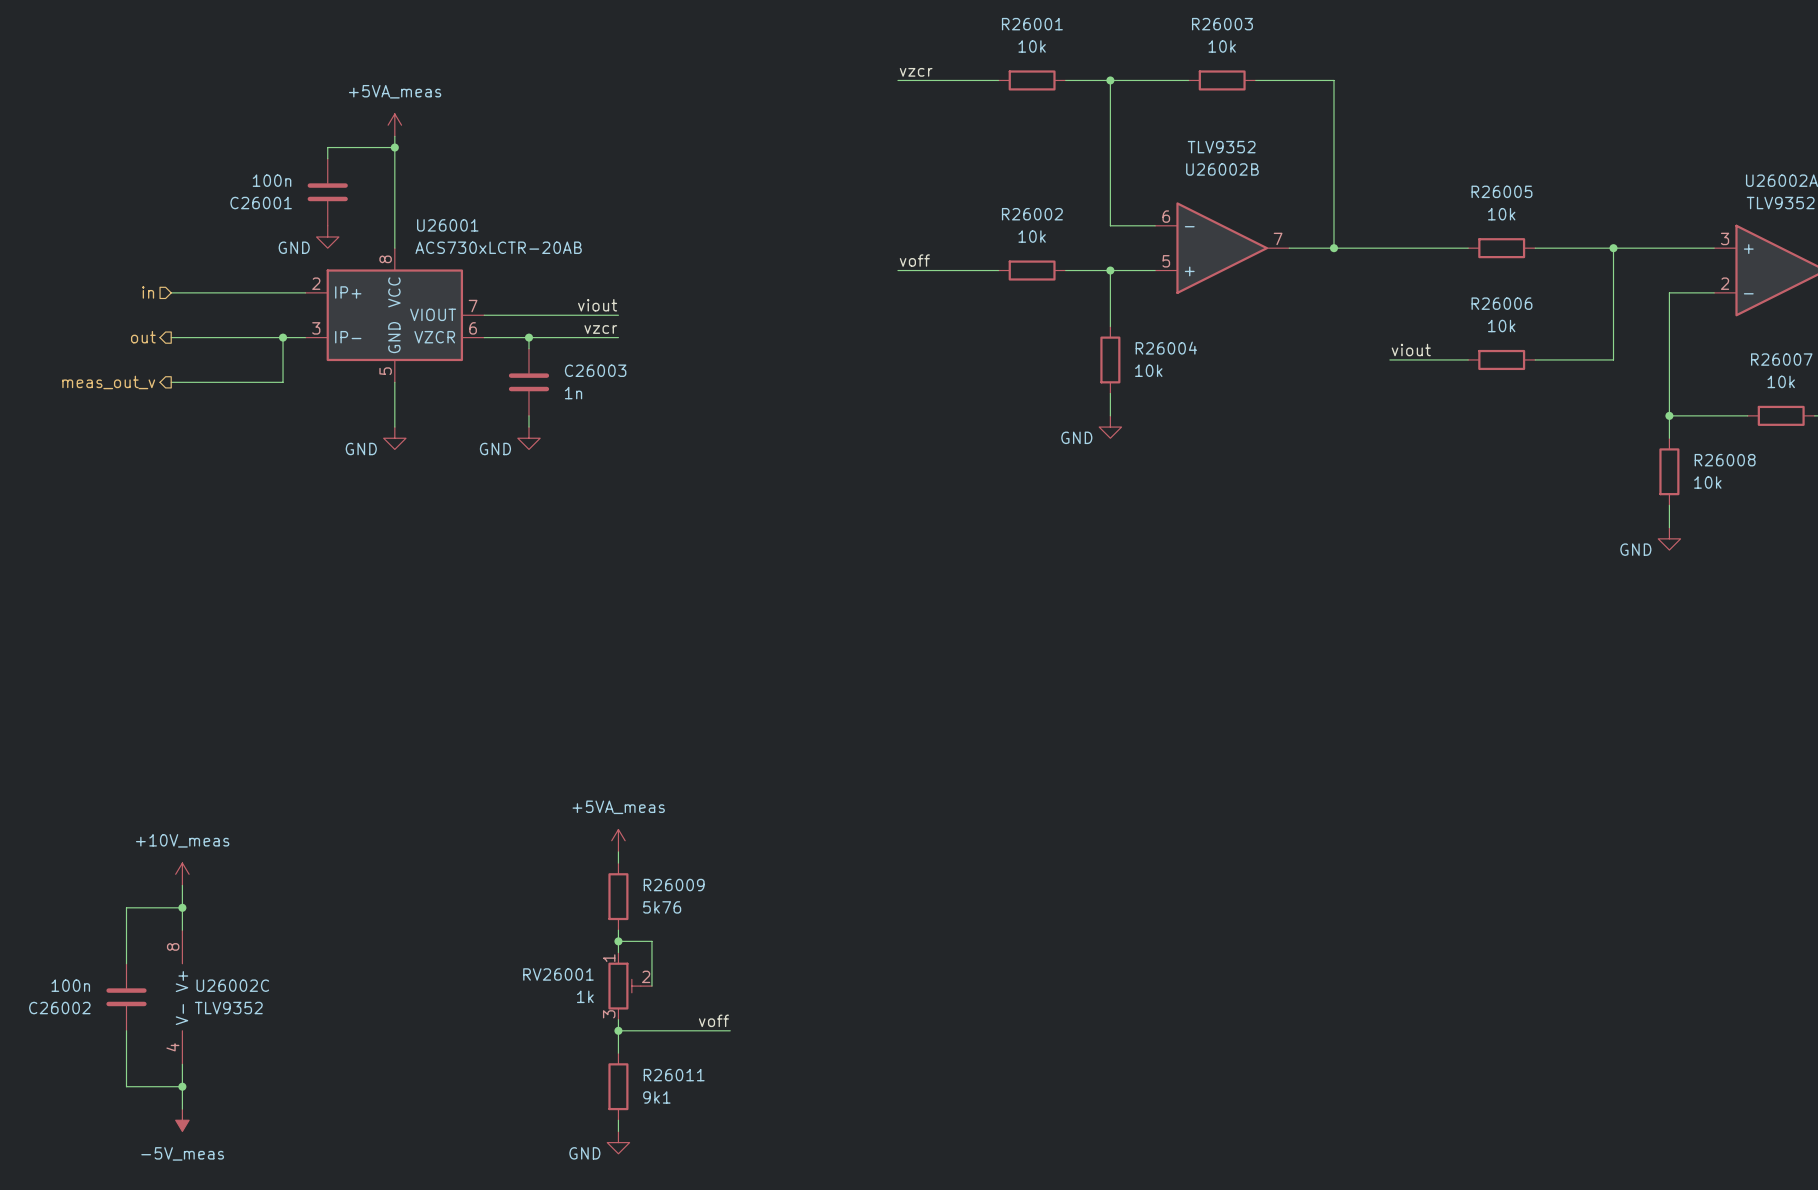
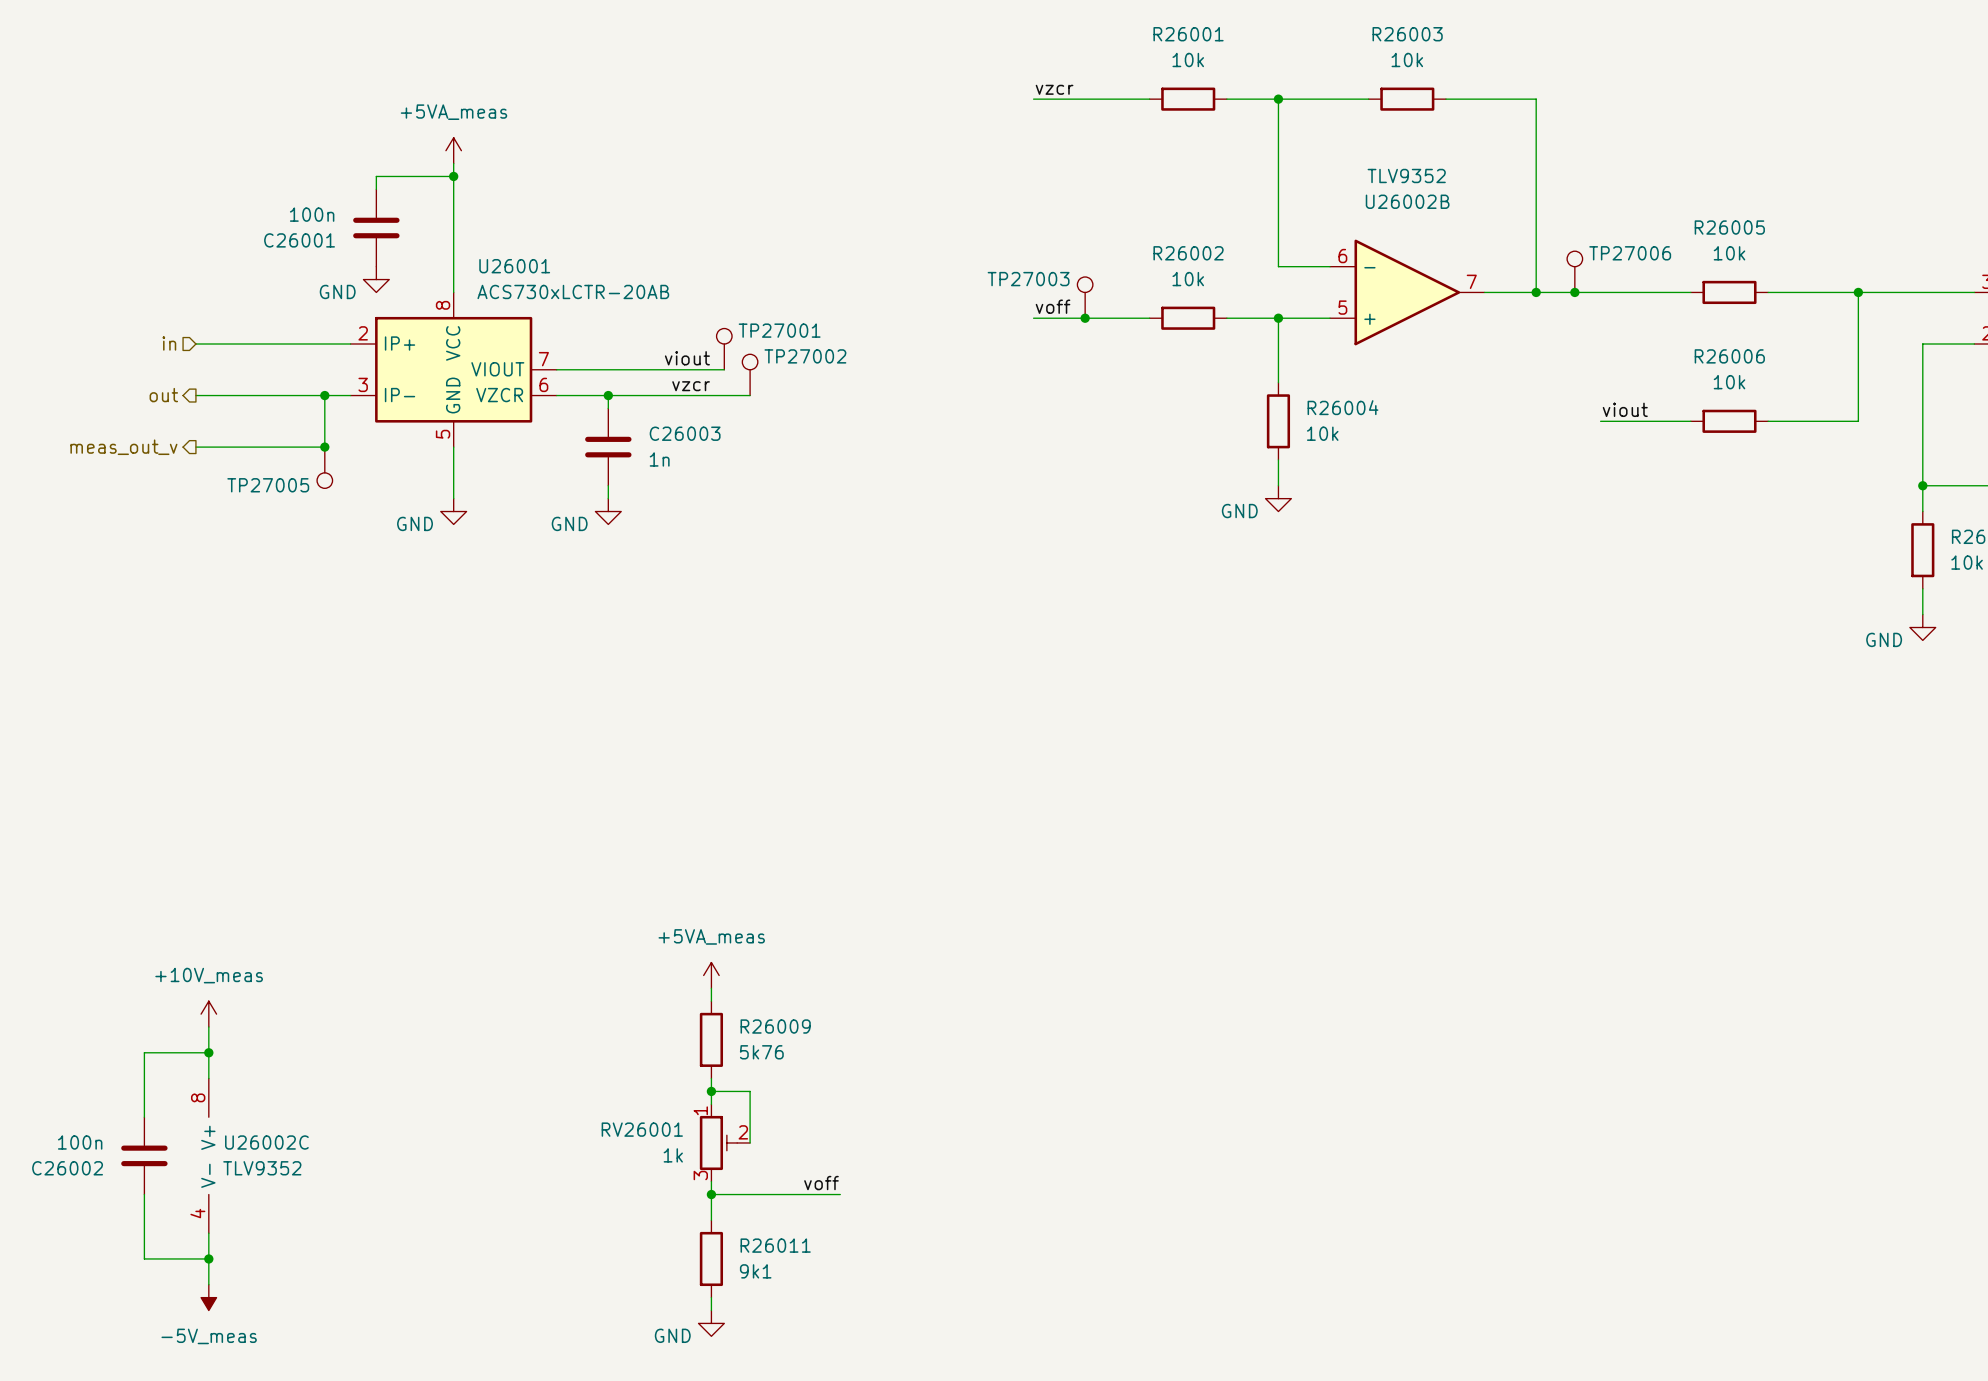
TP27006: none -> (1574, 271)
junction: none -> (1574, 292)
TP27003: none -> (1085, 297)
junction: none -> (1085, 318)
TP27001: none -> (724, 349)
wire: none -> (711, 369) (724, 369)
TP27002: none -> (750, 374)
wire: none -> (711, 395) (750, 395)
junction: none -> (324, 447)
TP27005: none -> (324, 467)

